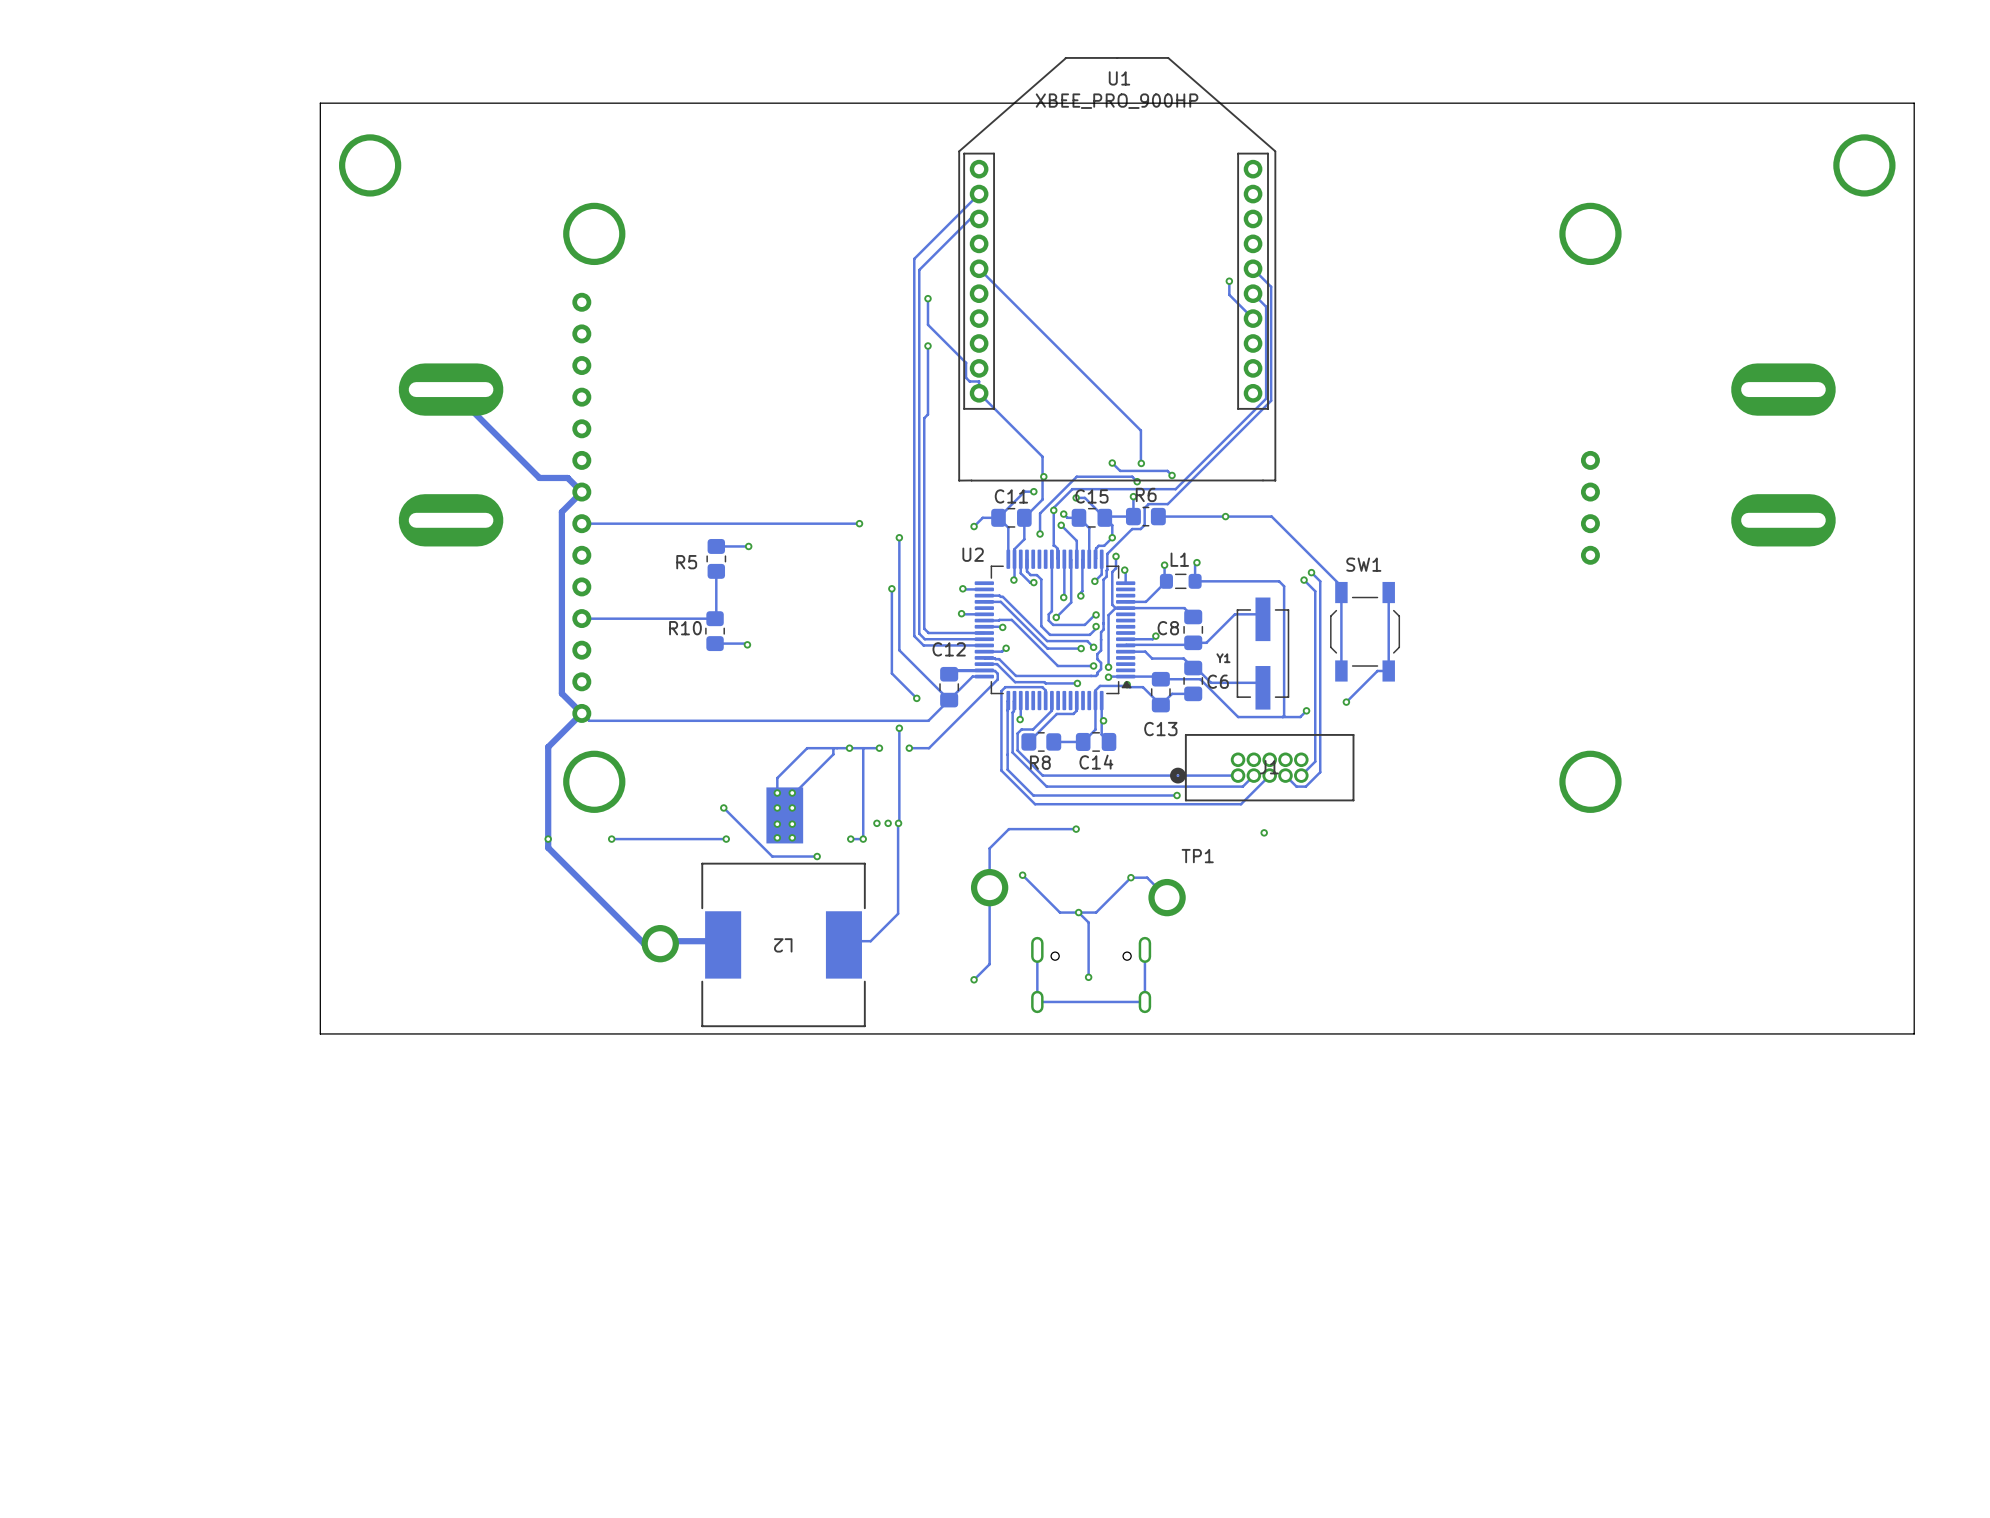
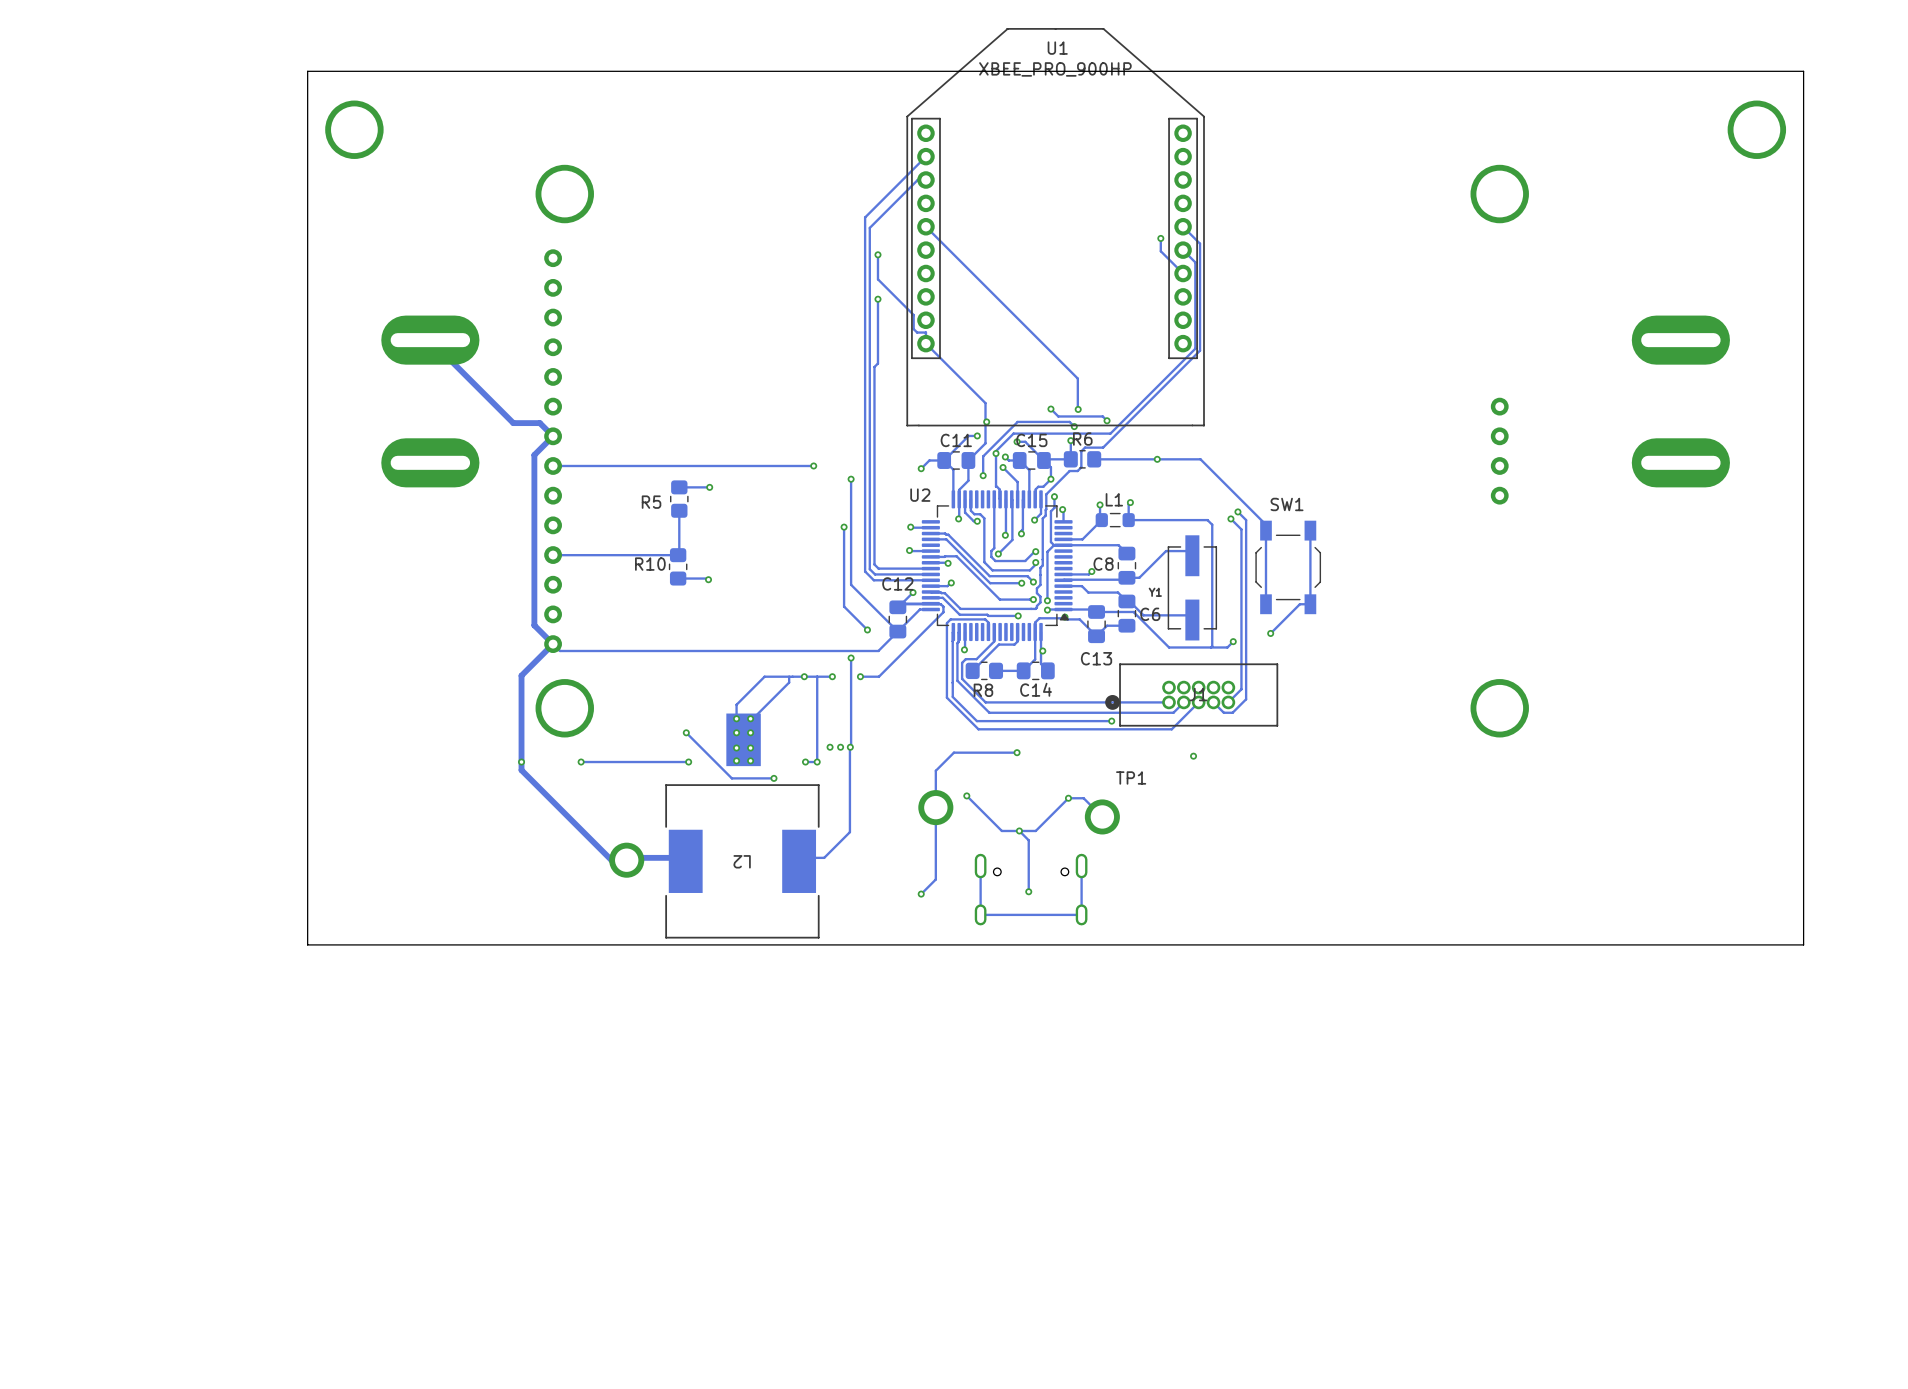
track: none -> (913, 592) (897, 607)
via: none -> (913, 592)

